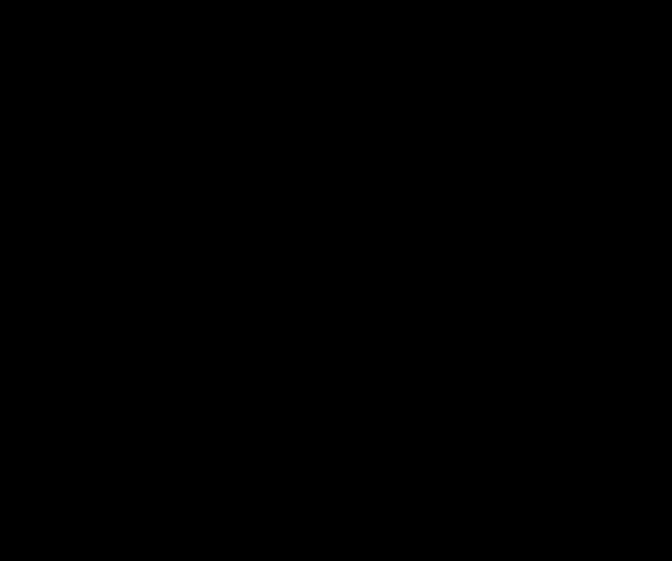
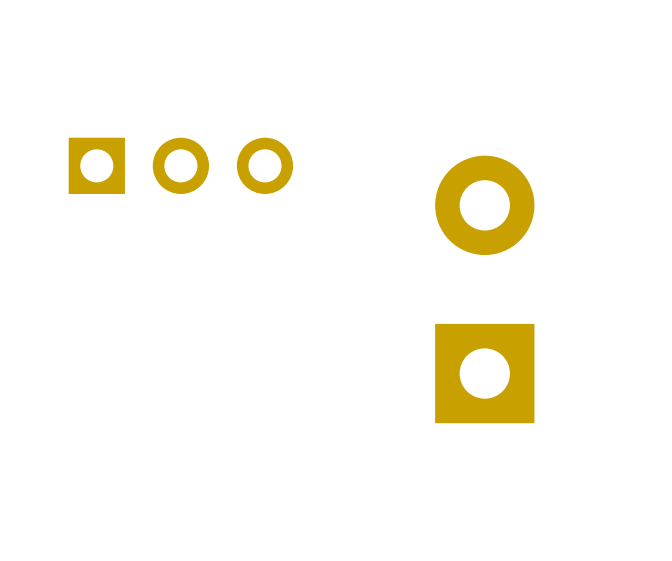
part: none -> (180, 165)
part: none -> (484, 289)

